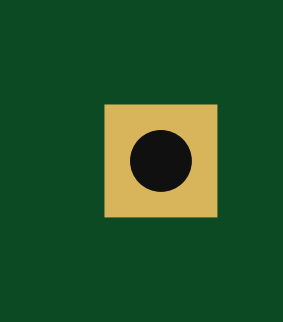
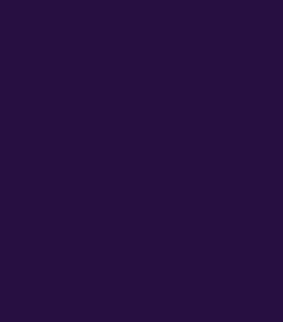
part: (160, 160) -> none

